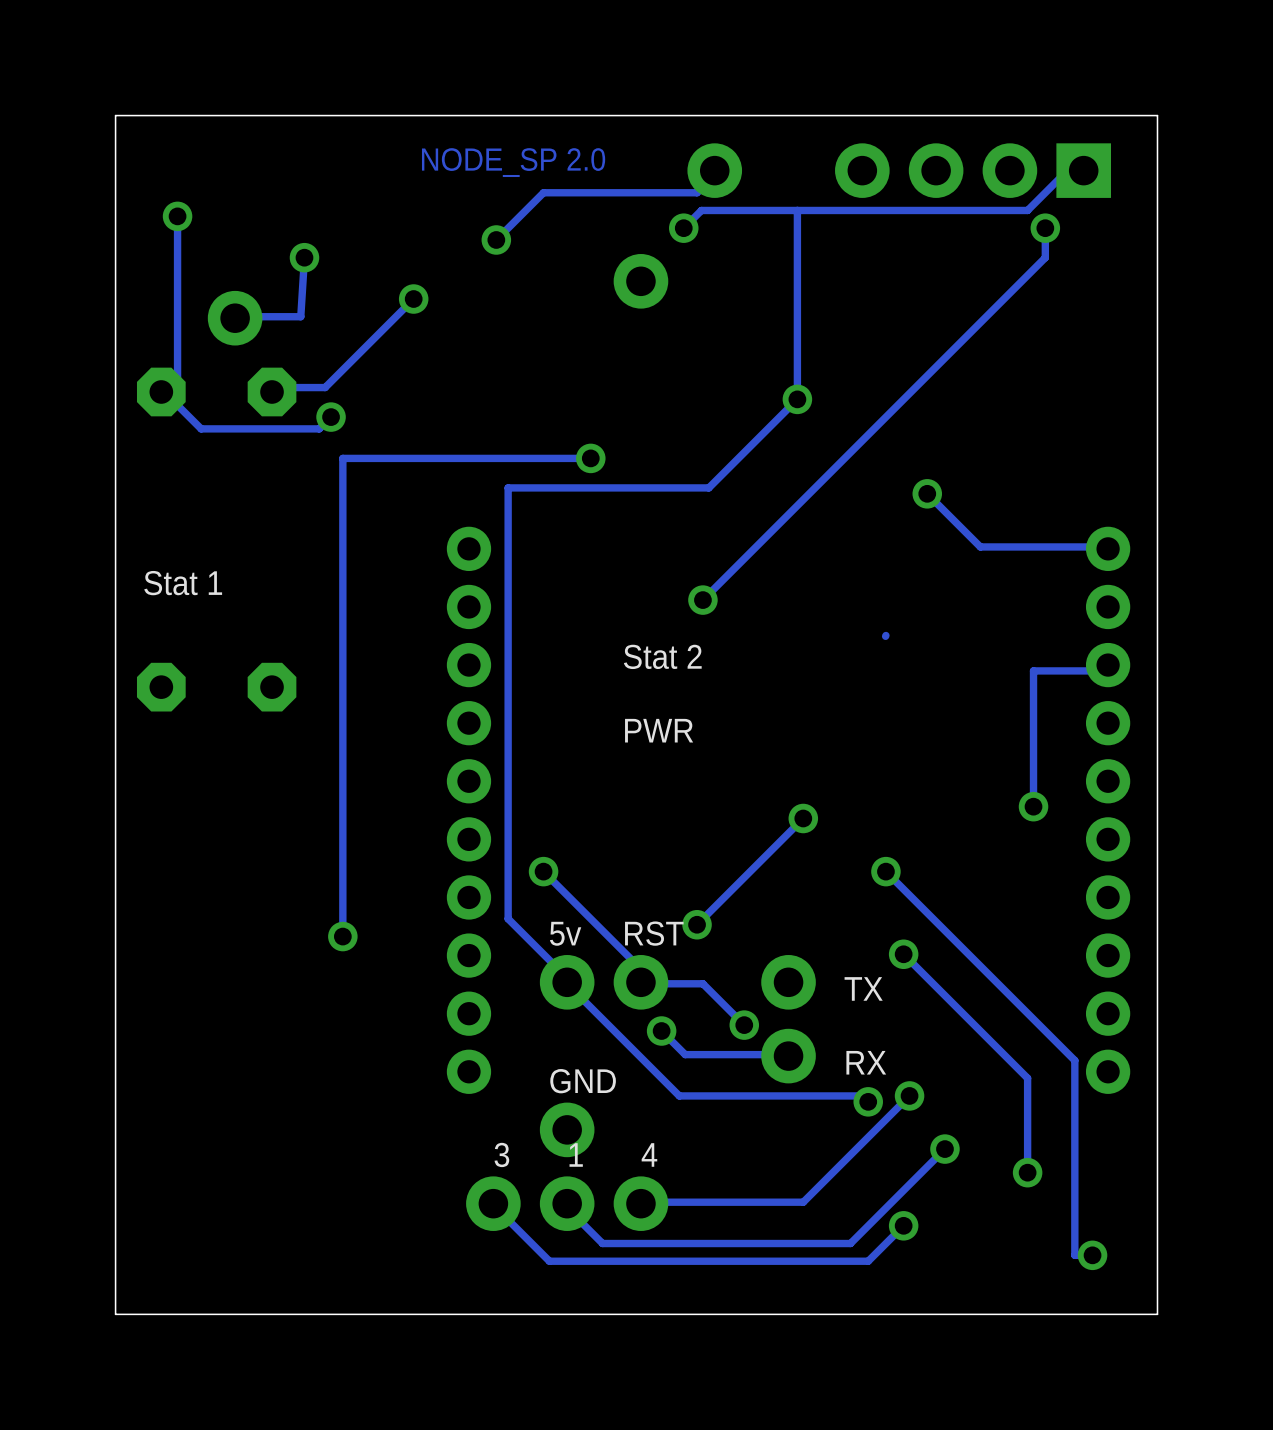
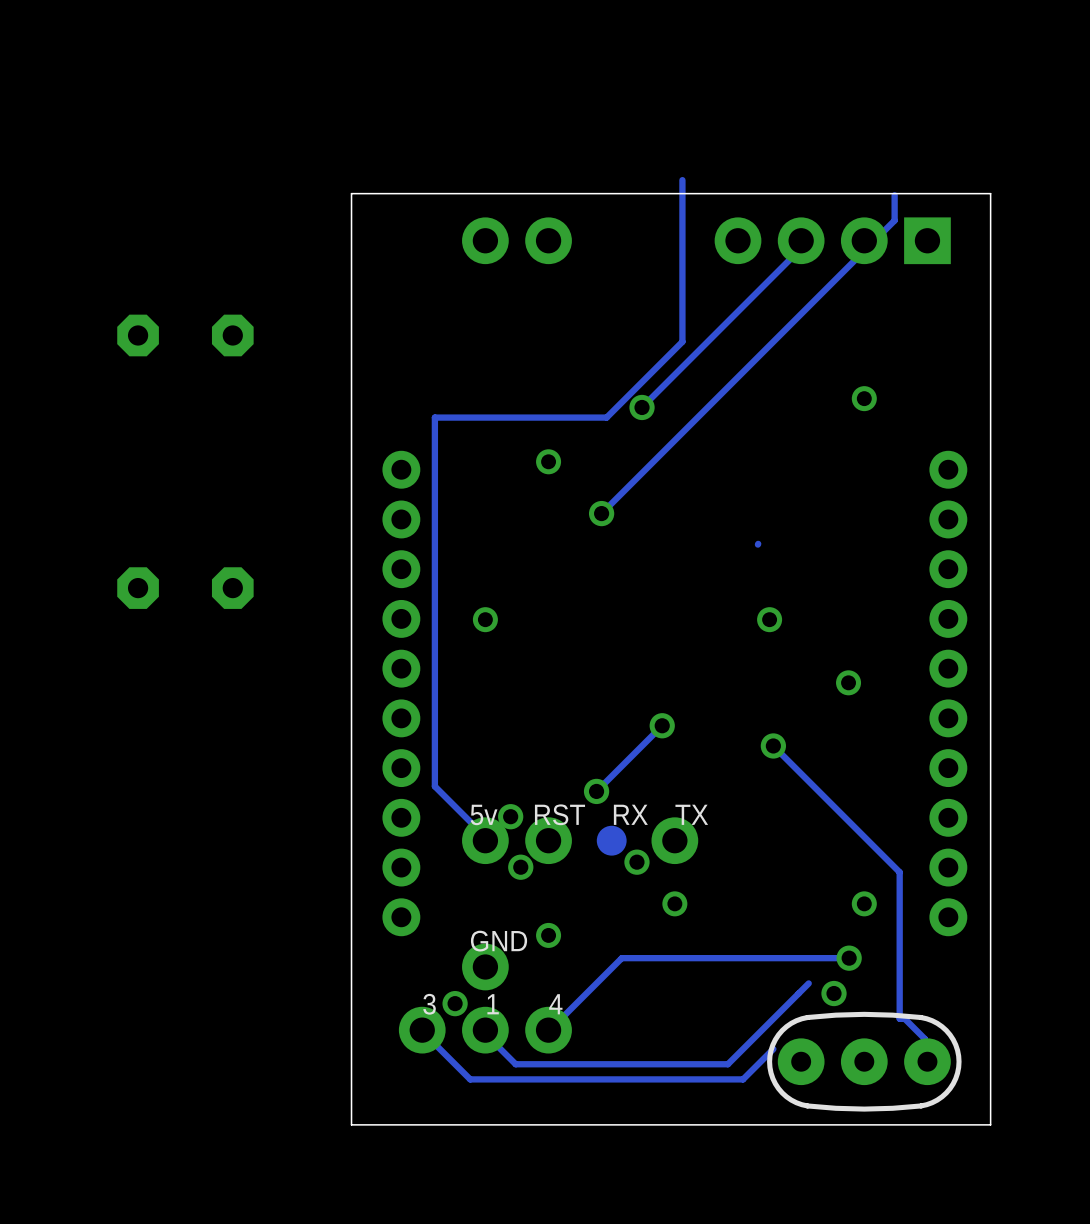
text: NODE_SP 2.0 (513, 162) -> none
track: (714, 170) (714, 175) (697, 192) (543, 192) (496, 239) -> none
part: (714, 170) -> none
part position: (973, 170) -> (832, 240)
track: (1083, 170) (1080, 175) (1063, 175) (1027, 210) (701, 210) (683, 228) -> none
track: (177, 216) (177, 387) (165, 387) (161, 391) (165, 393) (201, 428) (319, 428) (331, 417) -> none
via: (177, 216) -> none
board edge: (1157, 226) (1157, 115) (115, 115) (115, 1314) (410, 1314) -> (990, 193) (351, 193) (351, 1124)
via: (683, 228) -> none
via: (1045, 228) -> none
via: (496, 239) -> none
track: (304, 257) (300, 316) (235, 318) -> none
via: (304, 257) -> none
part: none -> (516, 240)
track: none -> (801, 240) (798, 240) (798, 250) (642, 407)
track: (413, 299) (325, 387) (272, 387) (272, 391) -> none
via: (413, 299) -> none
part: (235, 318) -> none
via: (797, 399) -> none
via: (331, 417) -> none
track: (590, 458) (342, 458) (342, 936) -> none
via: (590, 458) -> none
via: none -> (864, 398)
via: none -> (642, 407)
track: (927, 493) (980, 546) (1104, 546) (1108, 548) -> none
via: (927, 493) -> none
via: none -> (548, 461)
text: Stat 1 (183, 583) -> none
text: Stat 2 (662, 656) -> none
track: (1108, 665) (1104, 670) (1033, 670) (1033, 806) -> none
via: none -> (485, 619)
via: none -> (769, 619)
text: PWR (659, 730) -> none
via: none -> (848, 682)
via: (1033, 806) -> none
track: (803, 818) (773, 848) -> none
via position: (803, 818) -> (662, 725)
track: (543, 871) (638, 966) (638, 977) (640, 982) (702, 983) (744, 1025) -> none
via: (543, 871) -> none
track: (885, 871) (1074, 1060) (1074, 1255) (1092, 1255) -> none
via position: (885, 871) -> (773, 745)
track: none -> (773, 745) (899, 872) (899, 1018) (904, 1018) (924, 1038) (924, 1059) (927, 1061)
text position: 5v (565, 933) -> 5v (484, 814)
text position: RST (654, 933) -> RST (559, 814)
via: (342, 936) -> none
via: none -> (510, 816)
track: (903, 954) (1027, 1078) (1027, 1172) -> none
via: (903, 954) -> none
track: (567, 982) (679, 1095) (862, 1095) (868, 1101) -> none
part: none -> (611, 840)
text position: TX (863, 988) -> TX (691, 814)
via: none -> (520, 867)
via position: (744, 1025) -> (636, 862)
track: (661, 1031) (685, 1054) (788, 1056) -> none
via: (661, 1031) -> none
part: (788, 1056) -> none
via: none -> (674, 903)
via: none -> (864, 903)
text position: RX (866, 1062) -> RX (630, 814)
text position: GND (583, 1081) -> GND (499, 941)
via: none -> (548, 935)
track: (909, 1095) (803, 1202) (643, 1202) -> (849, 958) (621, 958) (551, 1028)
via: (909, 1095) -> none
via: (868, 1101) -> none
via: none -> (849, 958)
via: (944, 1149) -> none
text position: 3 (501, 1154) -> 3 (429, 1004)
text position: 1 (576, 1154) -> 1 (493, 1004)
text position: 4 (649, 1154) -> 4 (555, 1004)
via: none -> (834, 993)
via: none -> (455, 1003)
via: (1027, 1172) -> none
via: (903, 1225) -> none
part: none -> (864, 1061)
via: (1092, 1255) -> none

